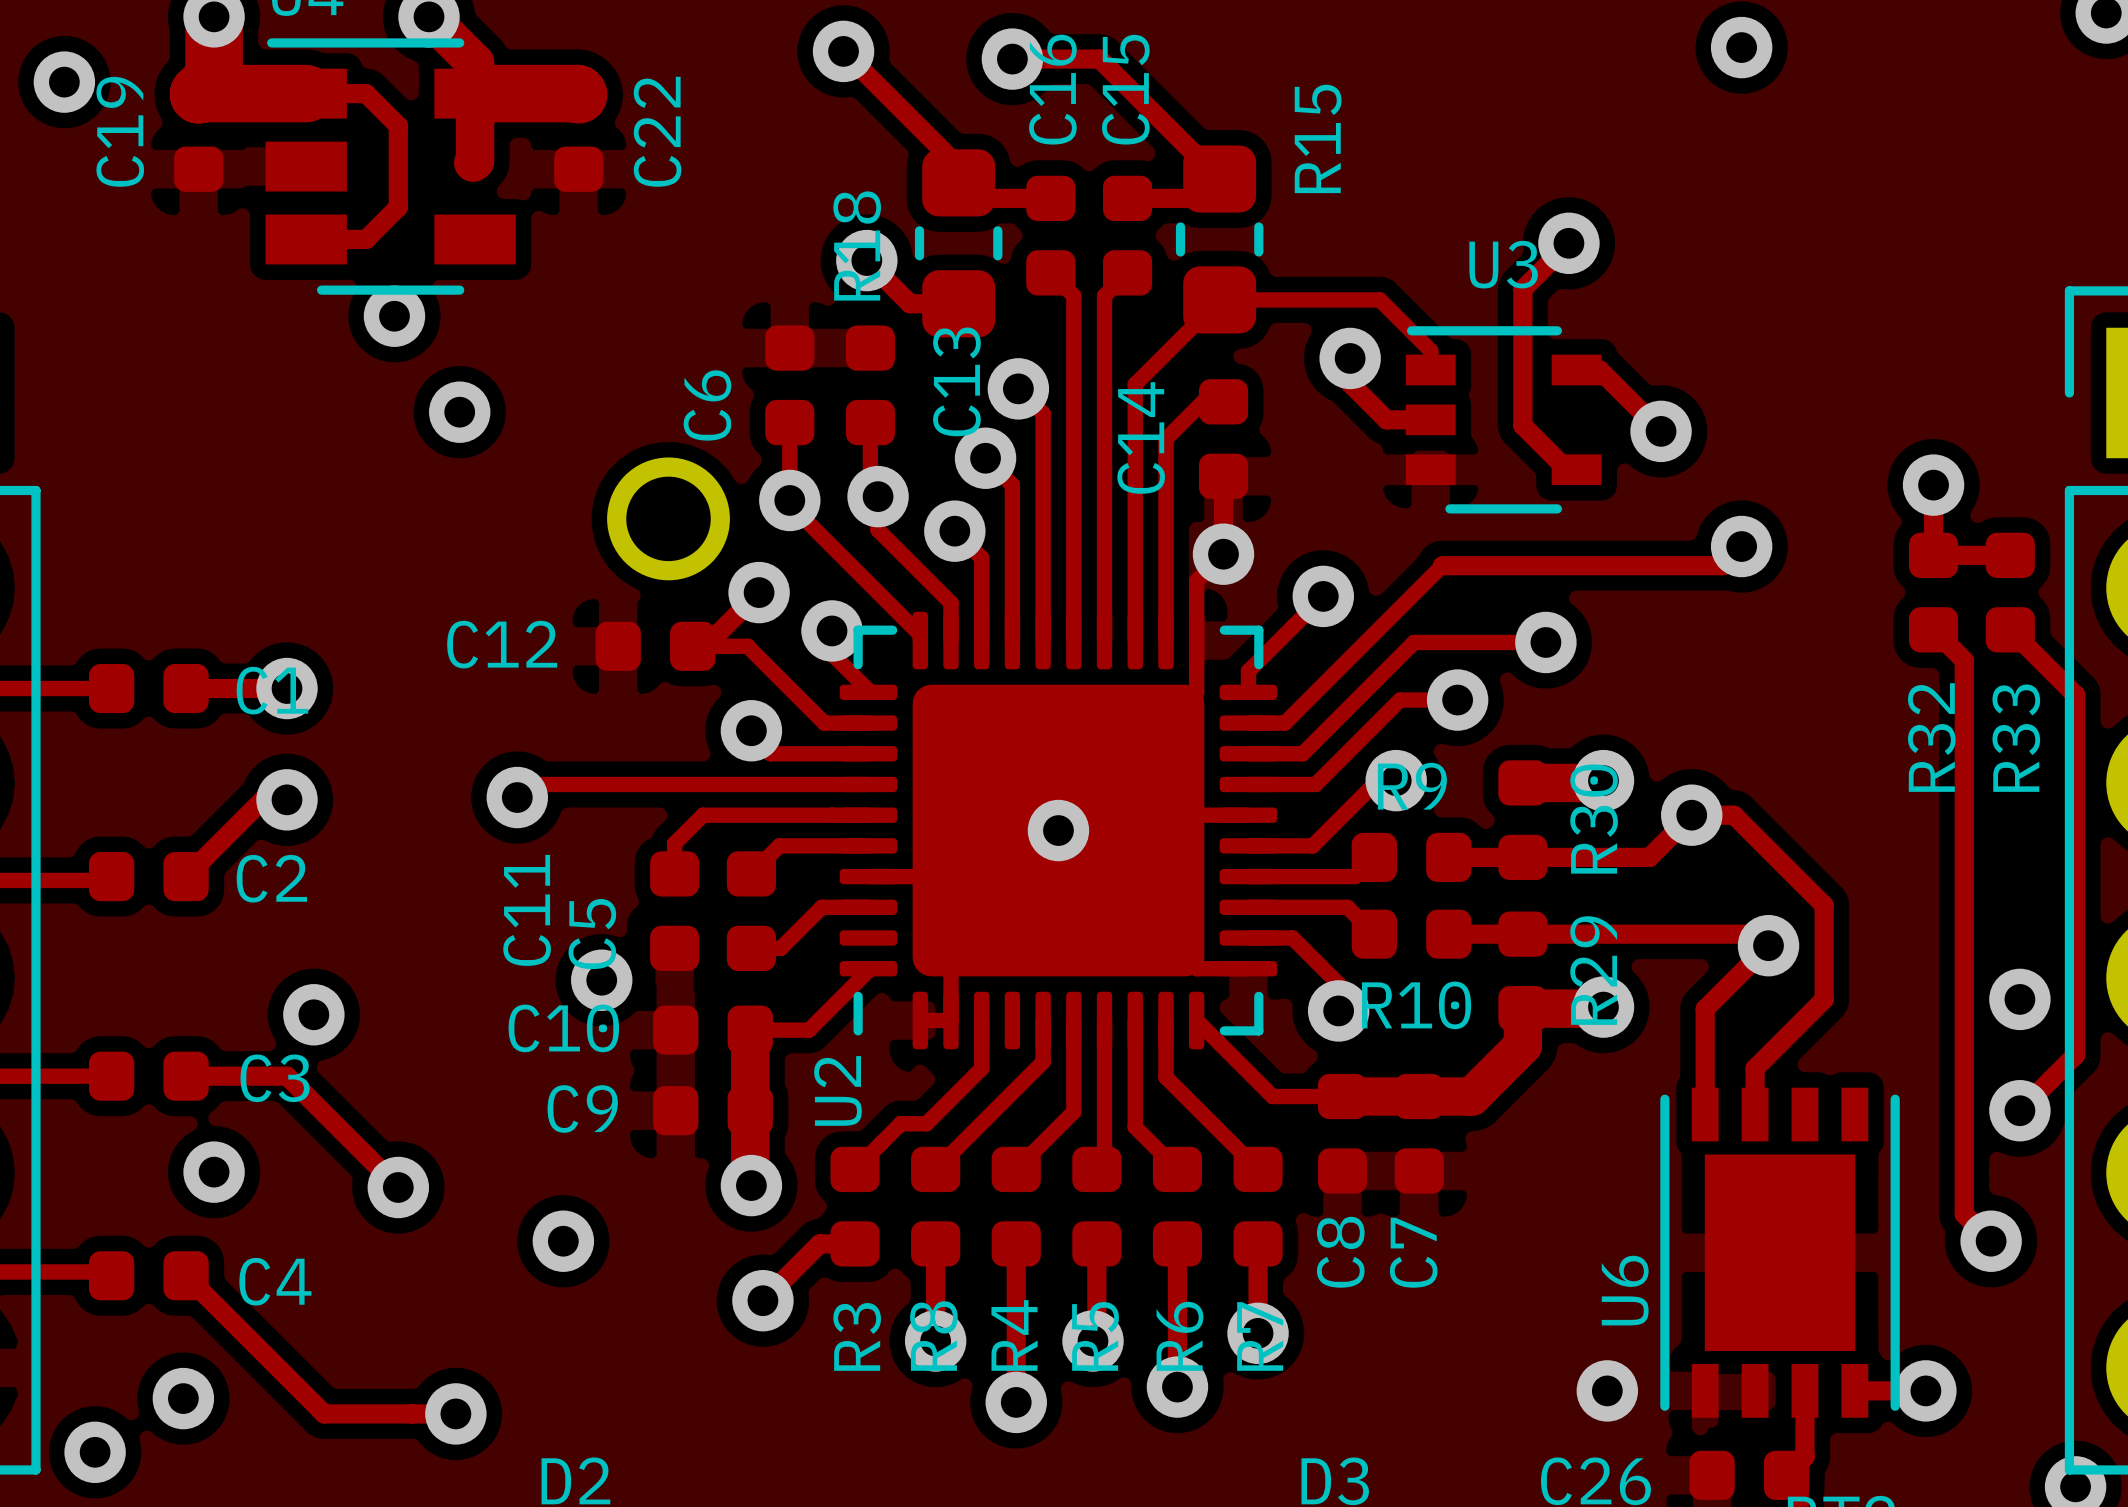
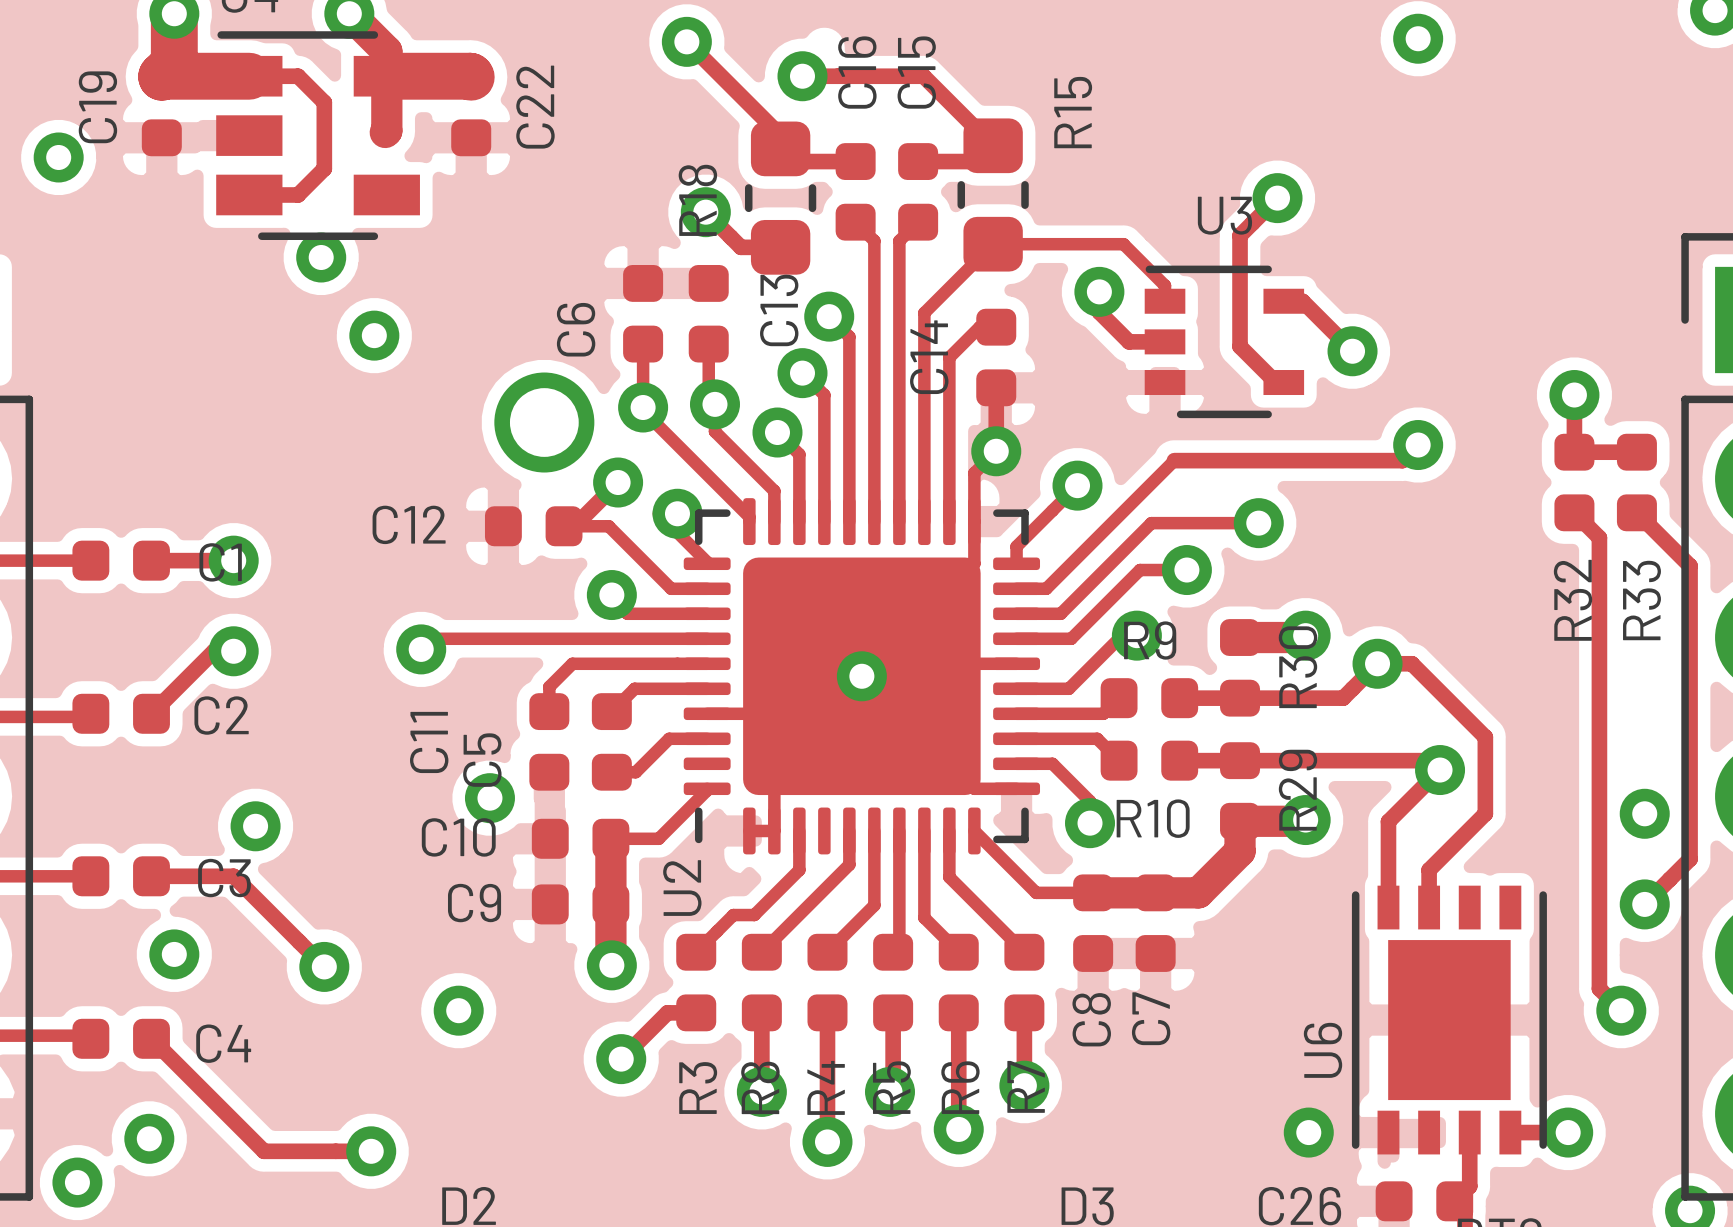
track: (1012, 59) (1099, 59) (1134, 93) -> (802, 76) (923, 76)
via position: (1012, 59) -> (802, 76)
via position: (64, 82) -> (58, 157)

